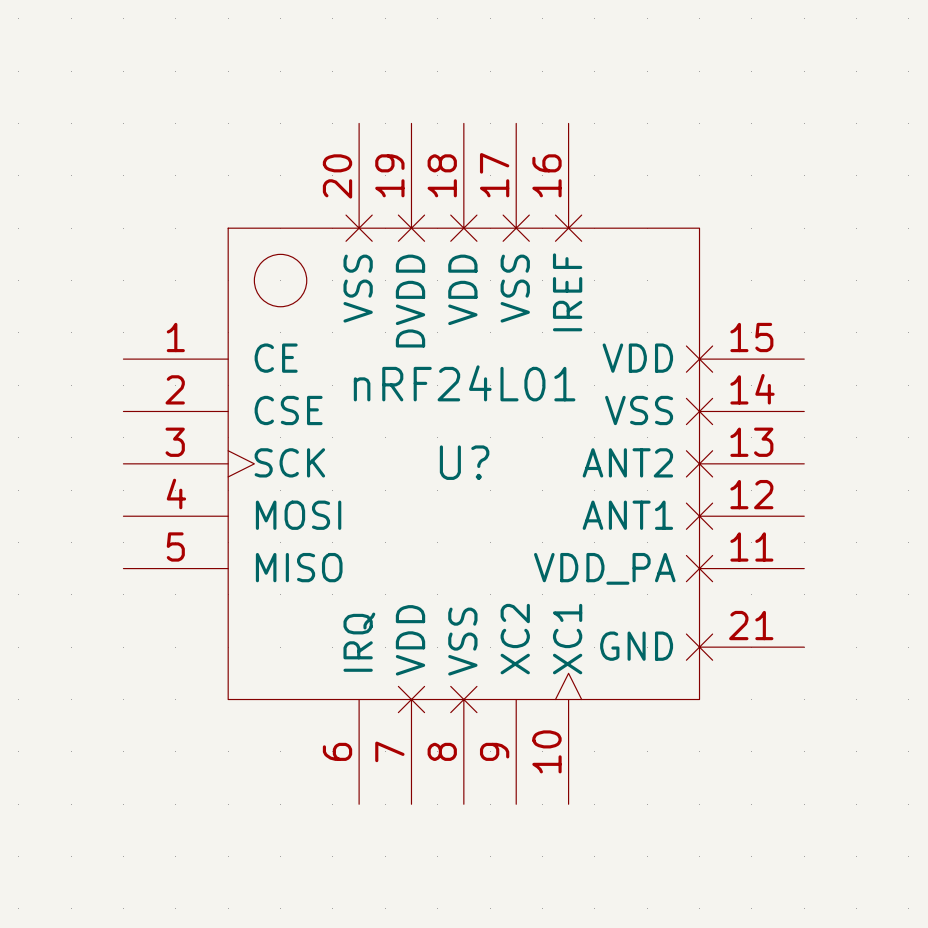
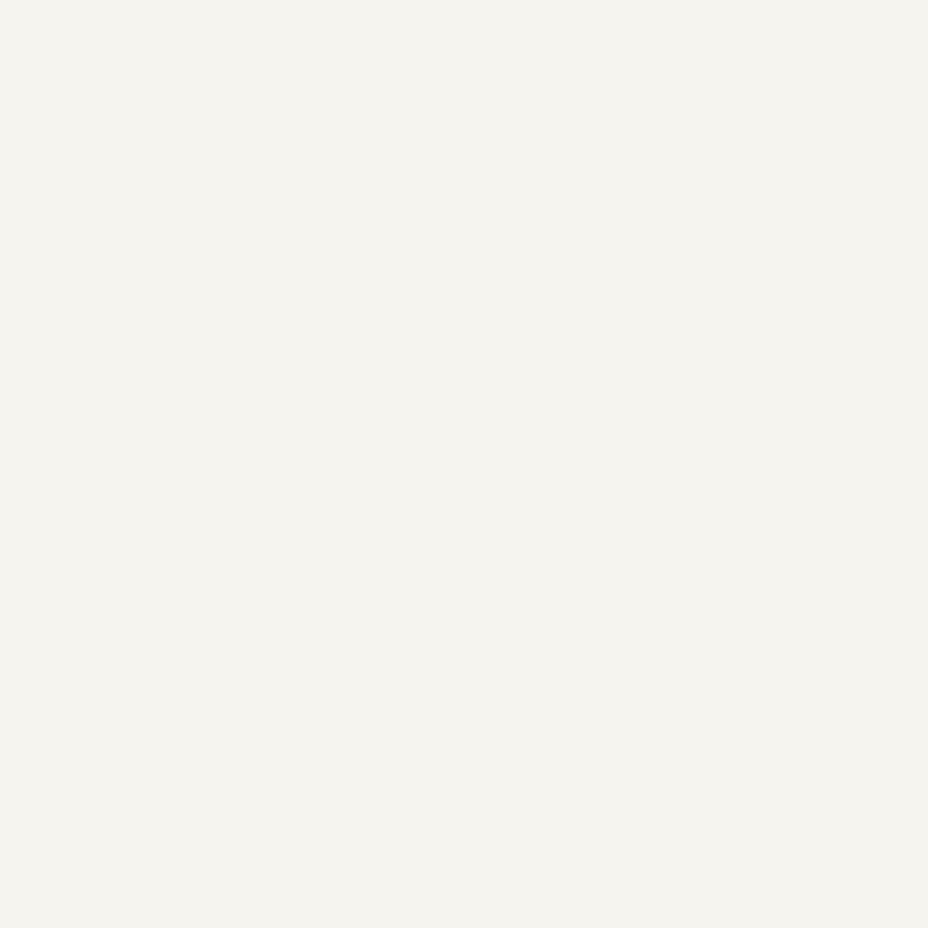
U?: nRF24L01 (463, 463) -> none

